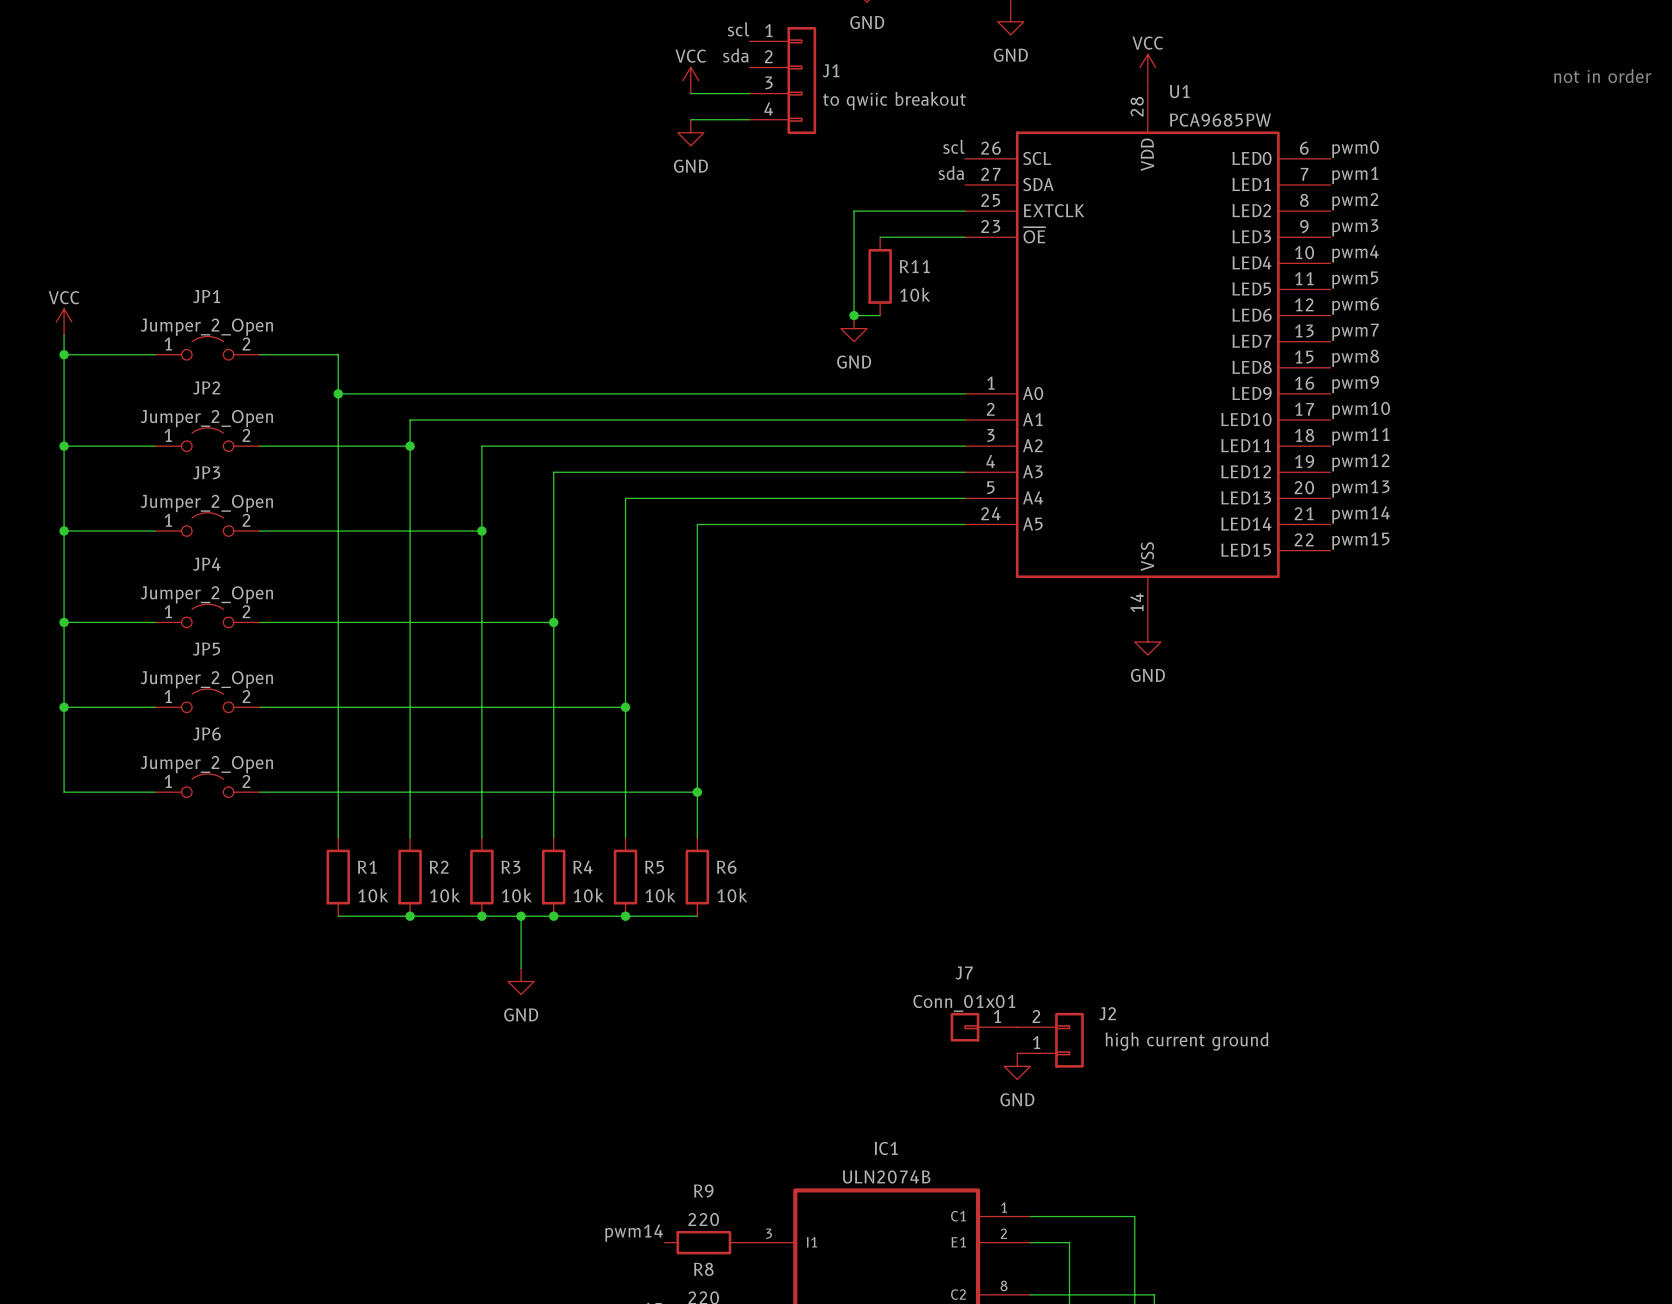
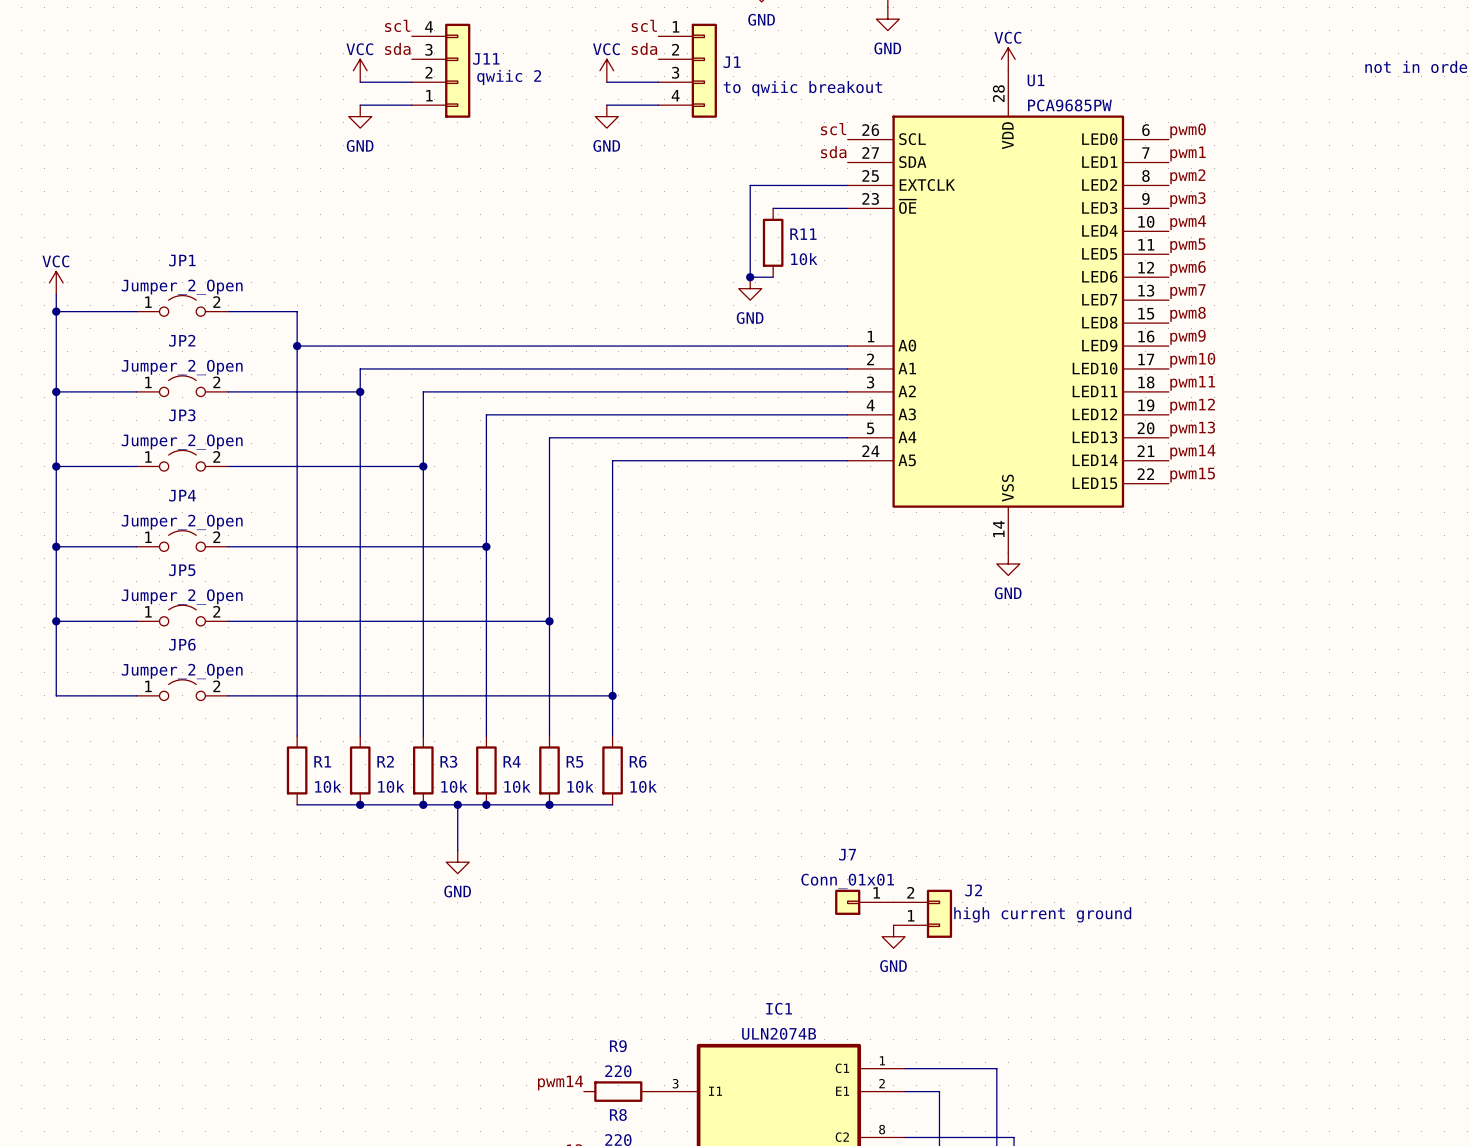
label: none -> scl (397, 25)
label: none -> sda (397, 48)
power symbol: none -> VCC (360, 70)
J11: none -> qwiic 2 (441, 70)
wire: none -> (360, 82) (411, 82)
wire: none -> (360, 105) (411, 105)
power symbol: none -> GND (360, 116)

